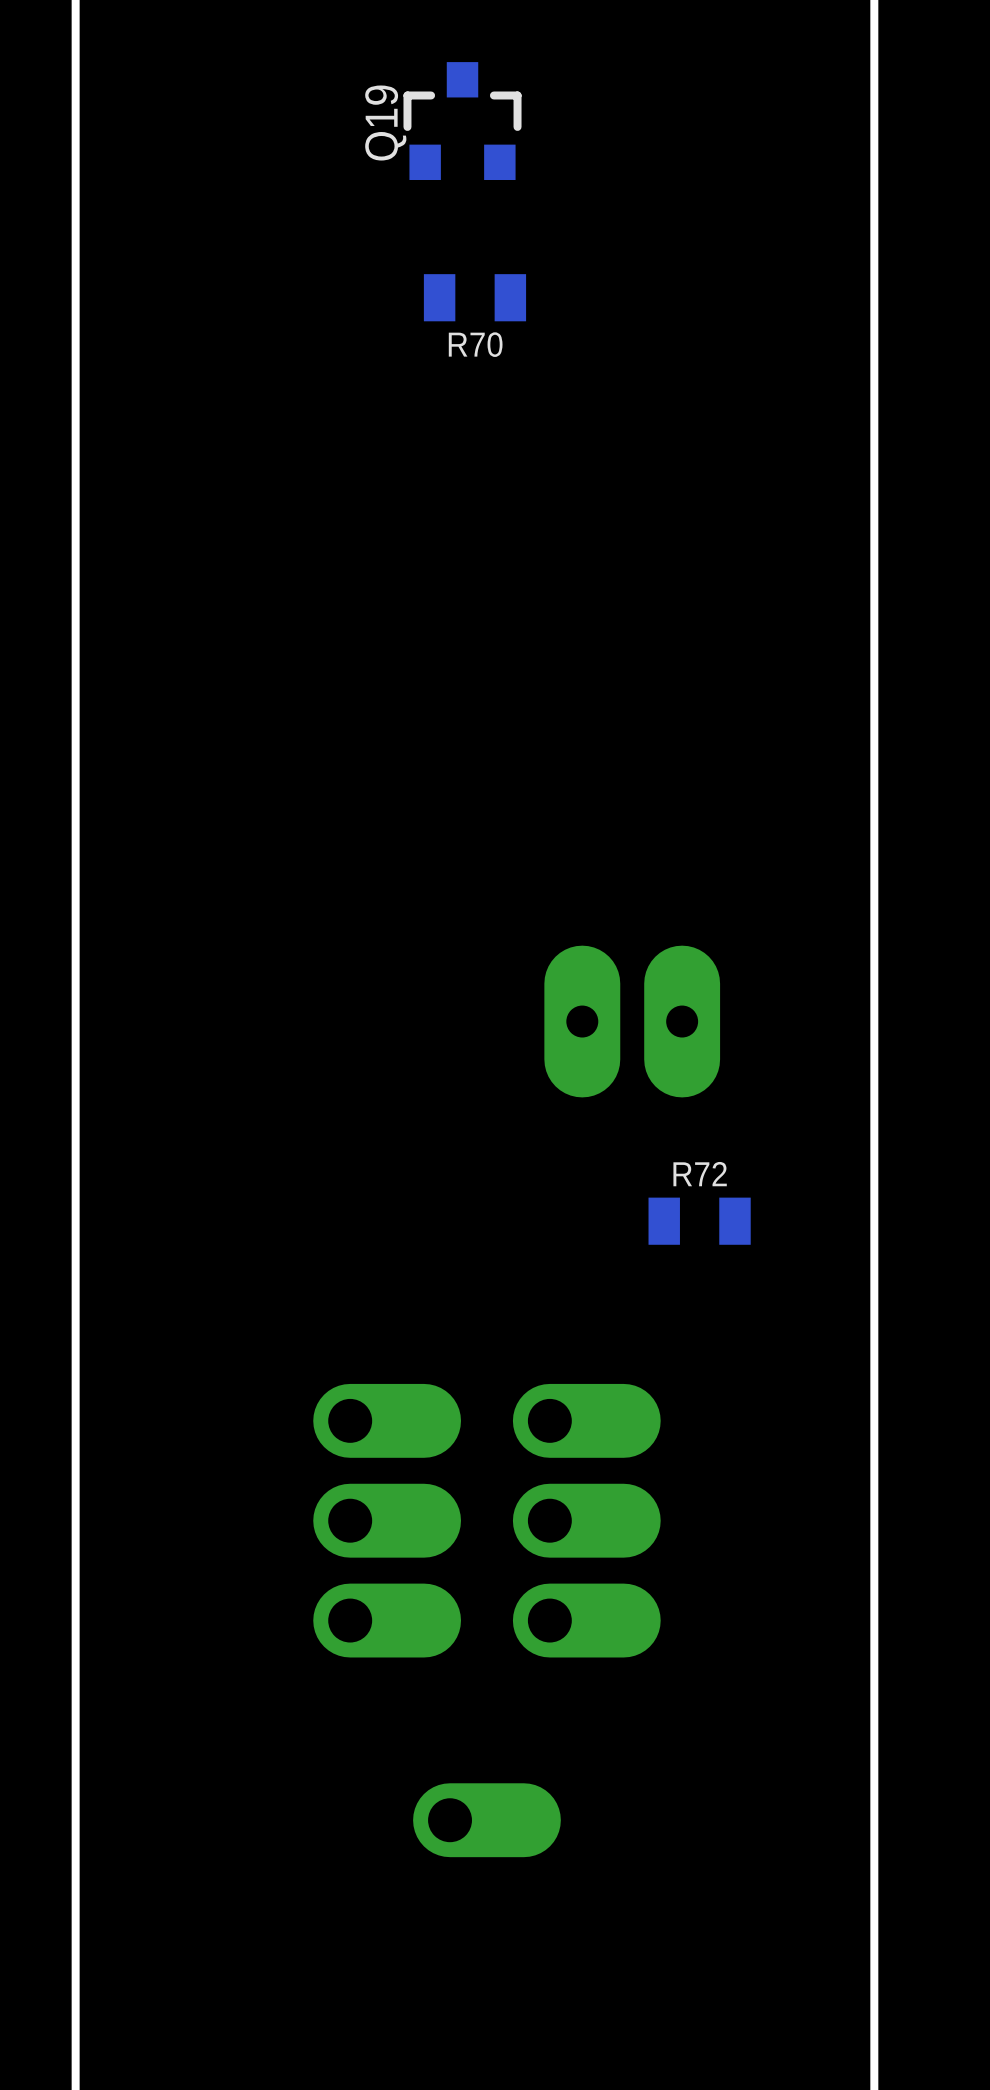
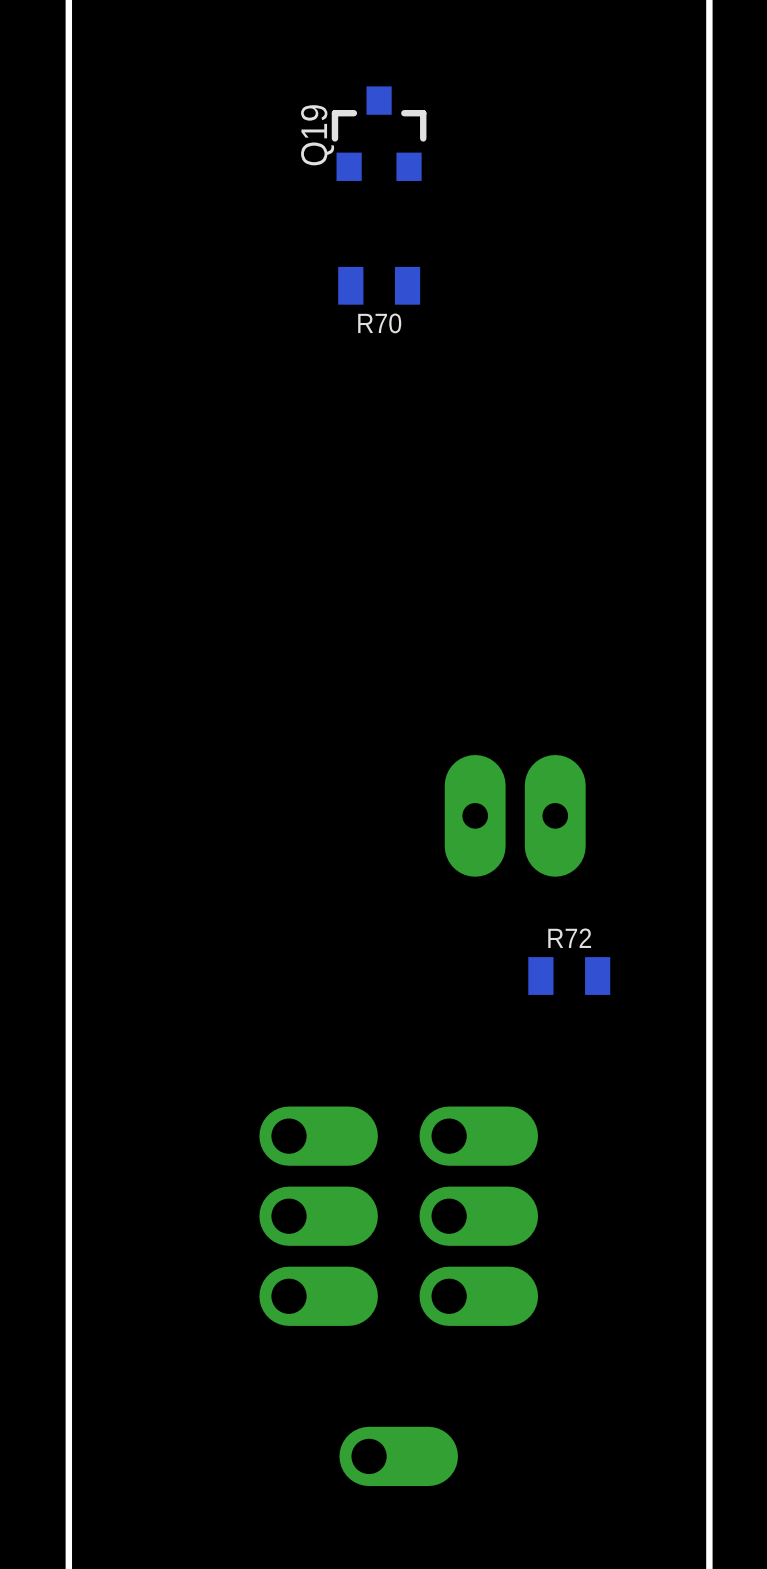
Q19 position: (462, 121) -> (379, 133)
R70 position: (474, 297) -> (379, 285)

